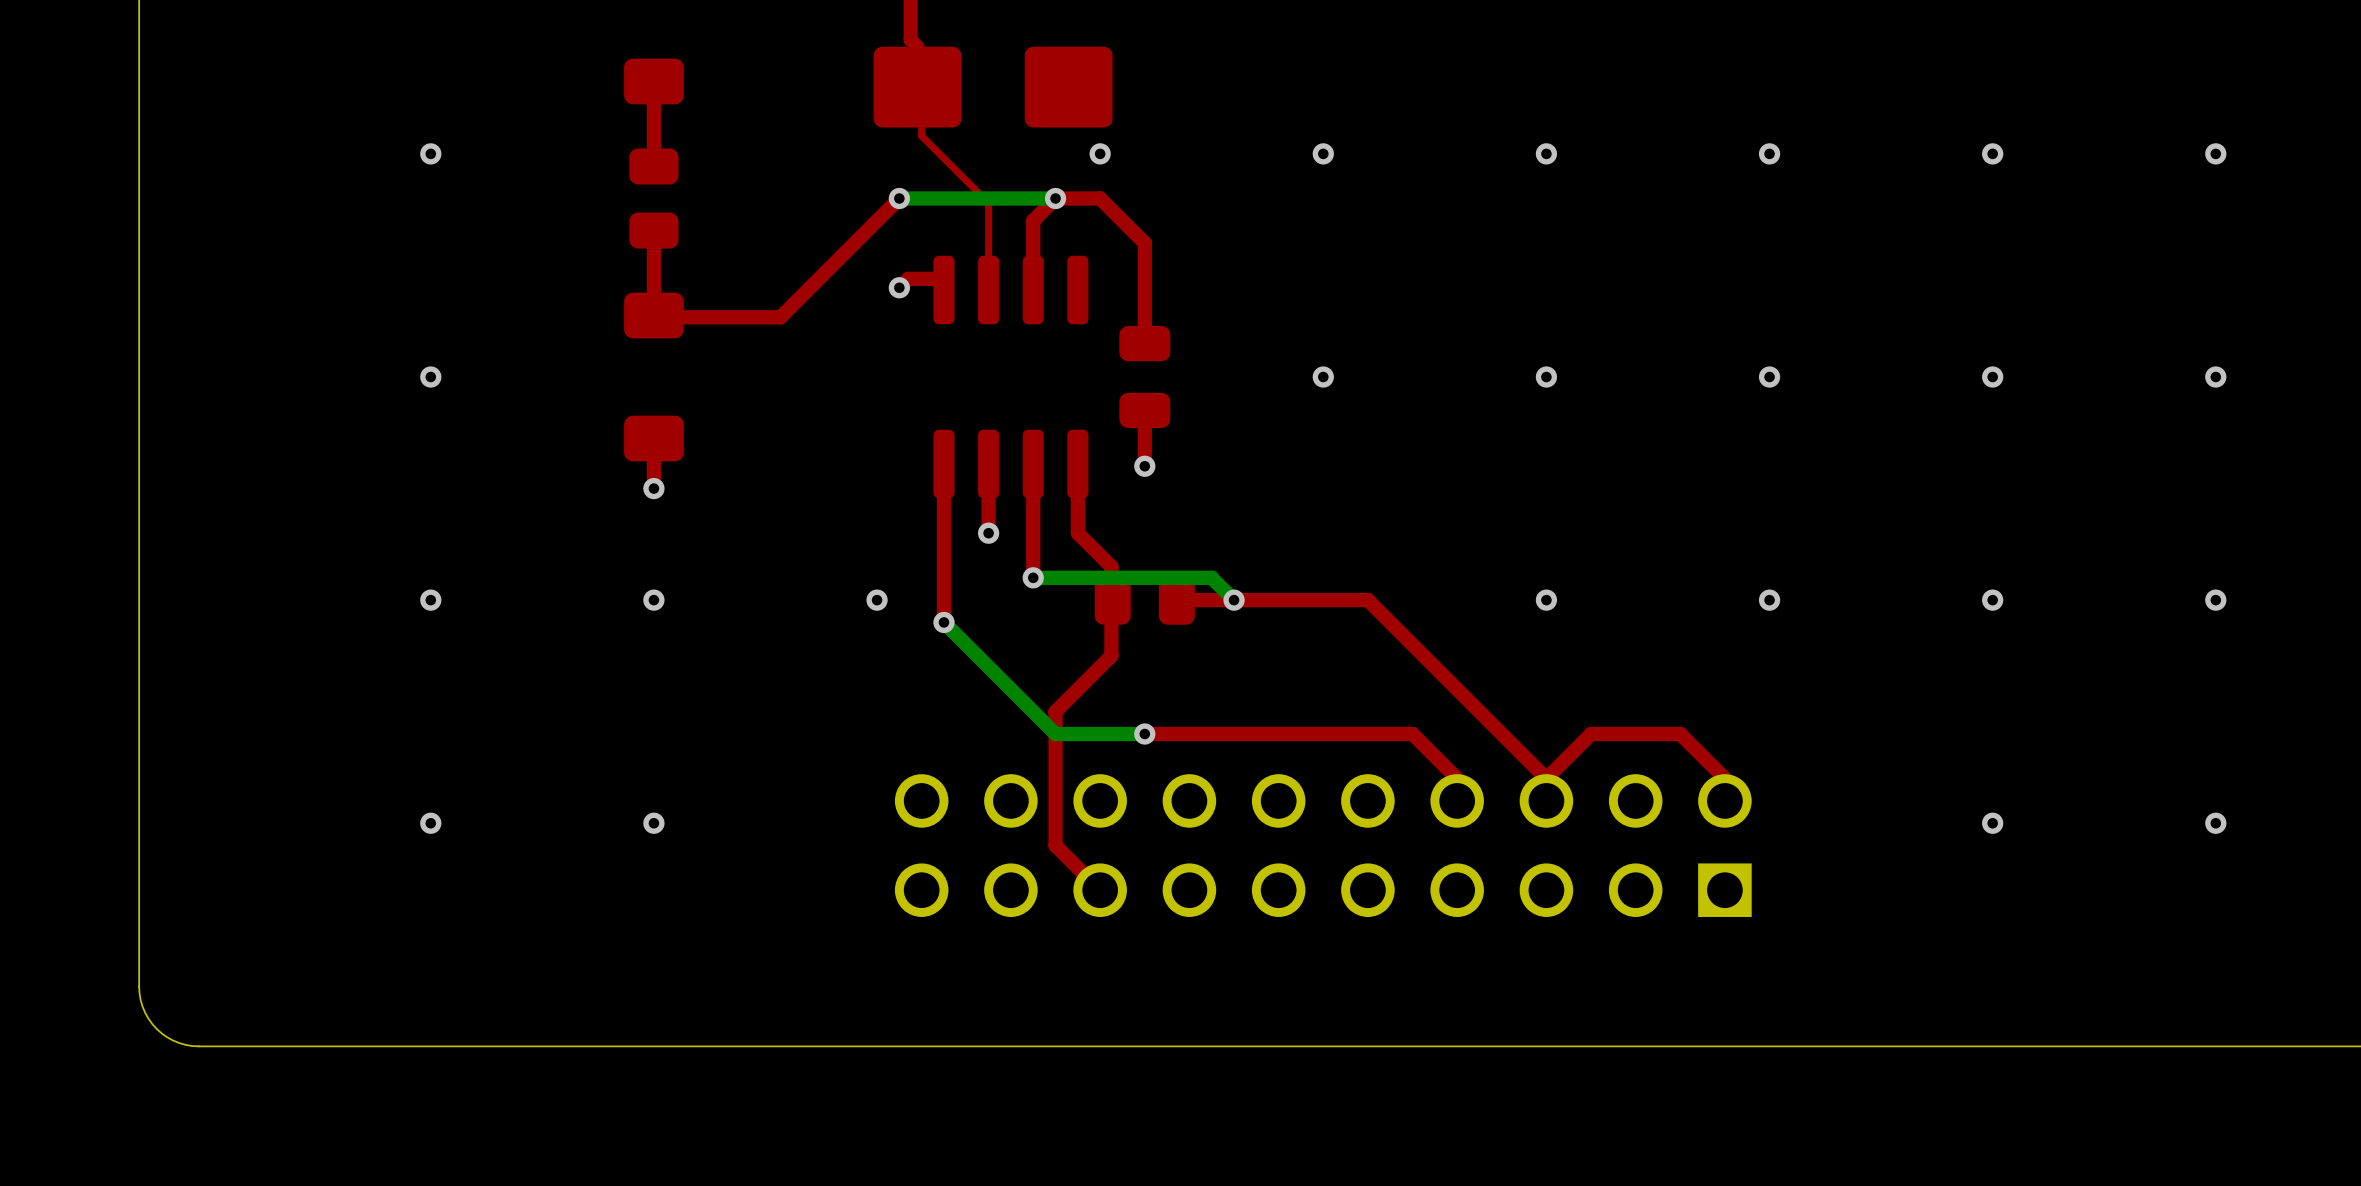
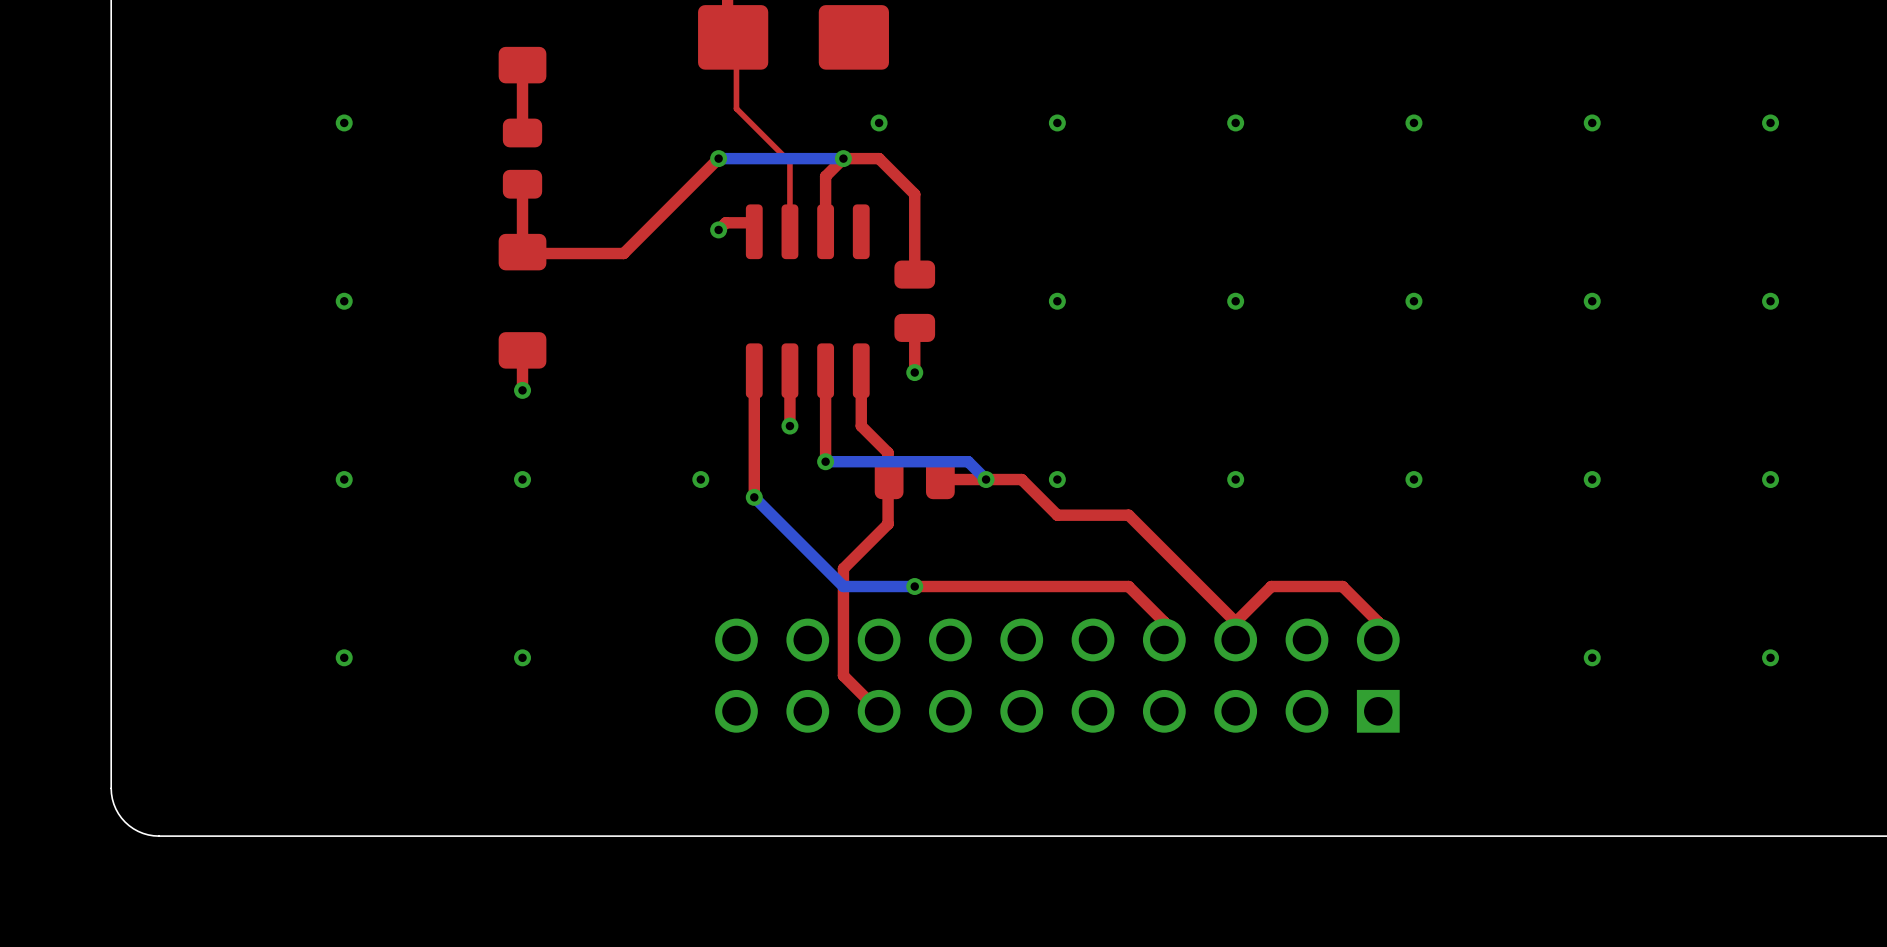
part position: (993, 87) -> (793, 37)
top track: (1278, 600) (1367, 600) (1412, 644) -> (1021, 479) (1057, 515) (1128, 515)
via: none -> (1057, 479)

